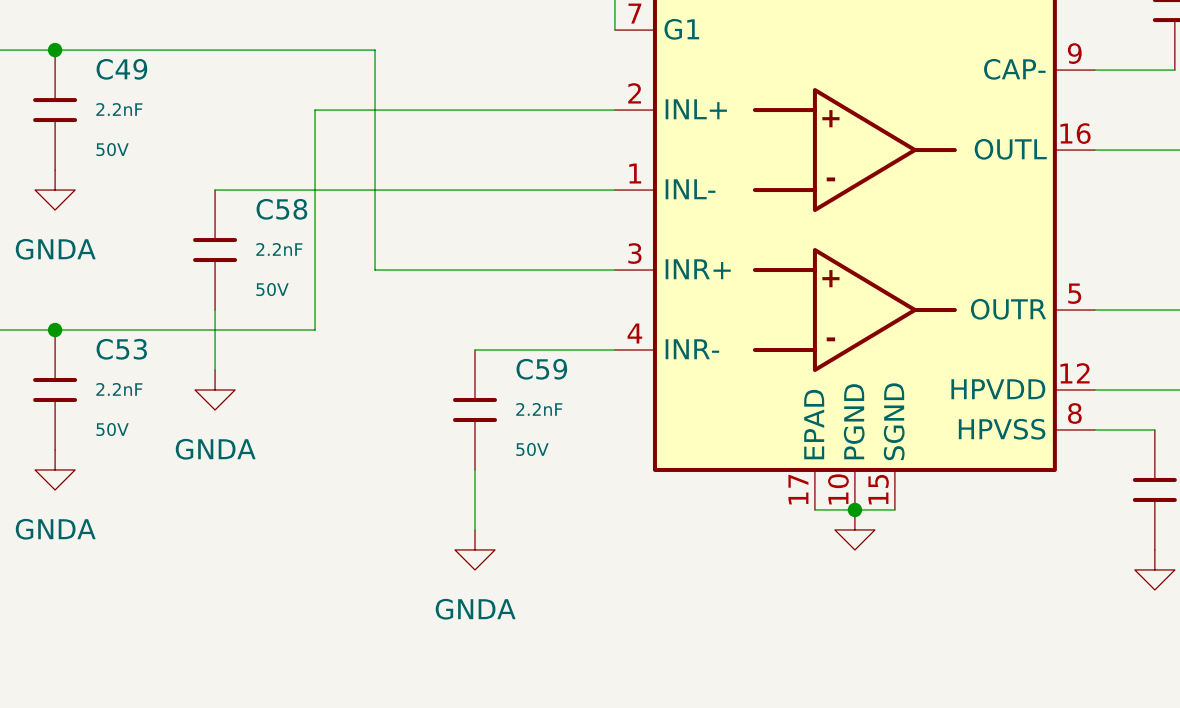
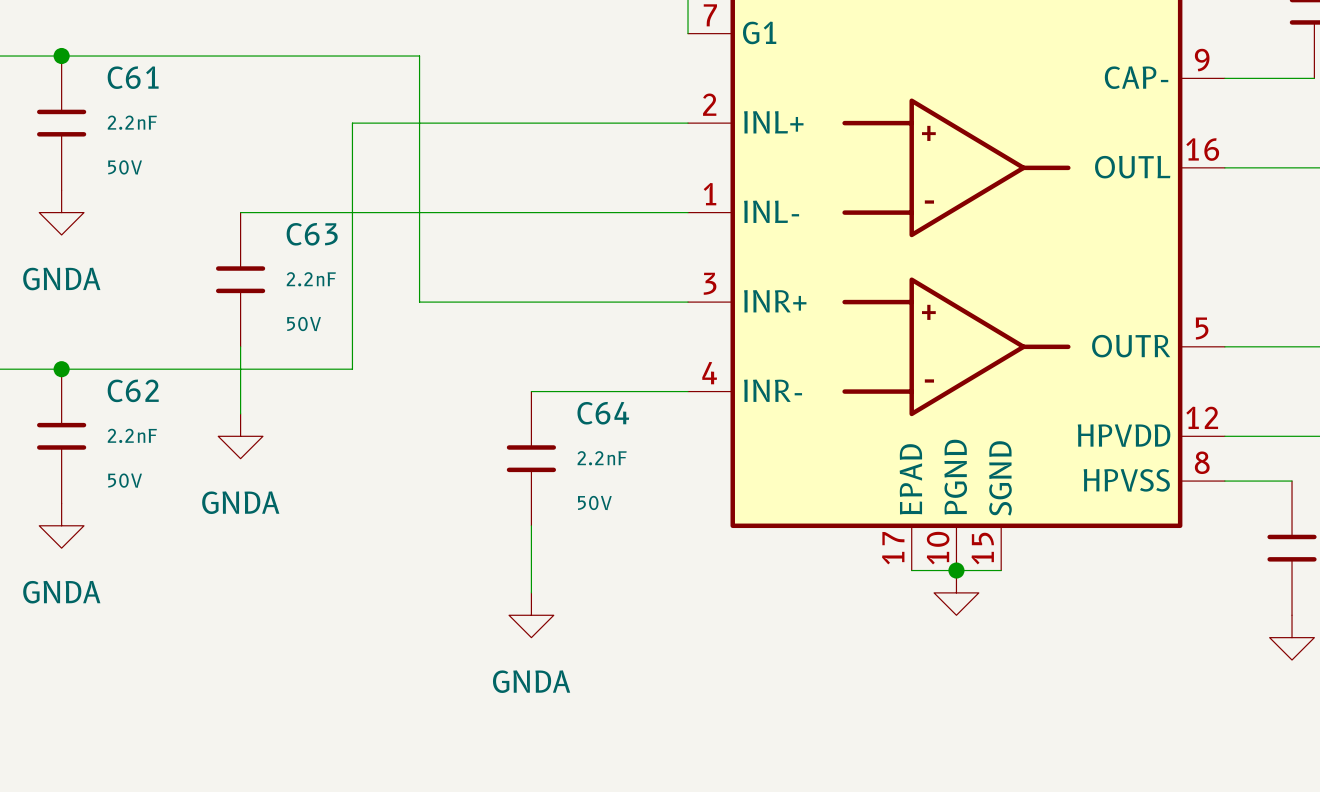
C49 name: C49 (121, 69) -> C61 (133, 77)
C58 name: C58 (281, 209) -> C63 (312, 234)
C53 name: C53 (121, 349) -> C62 (133, 390)
C59 name: C59 (541, 369) -> C64 (603, 413)

